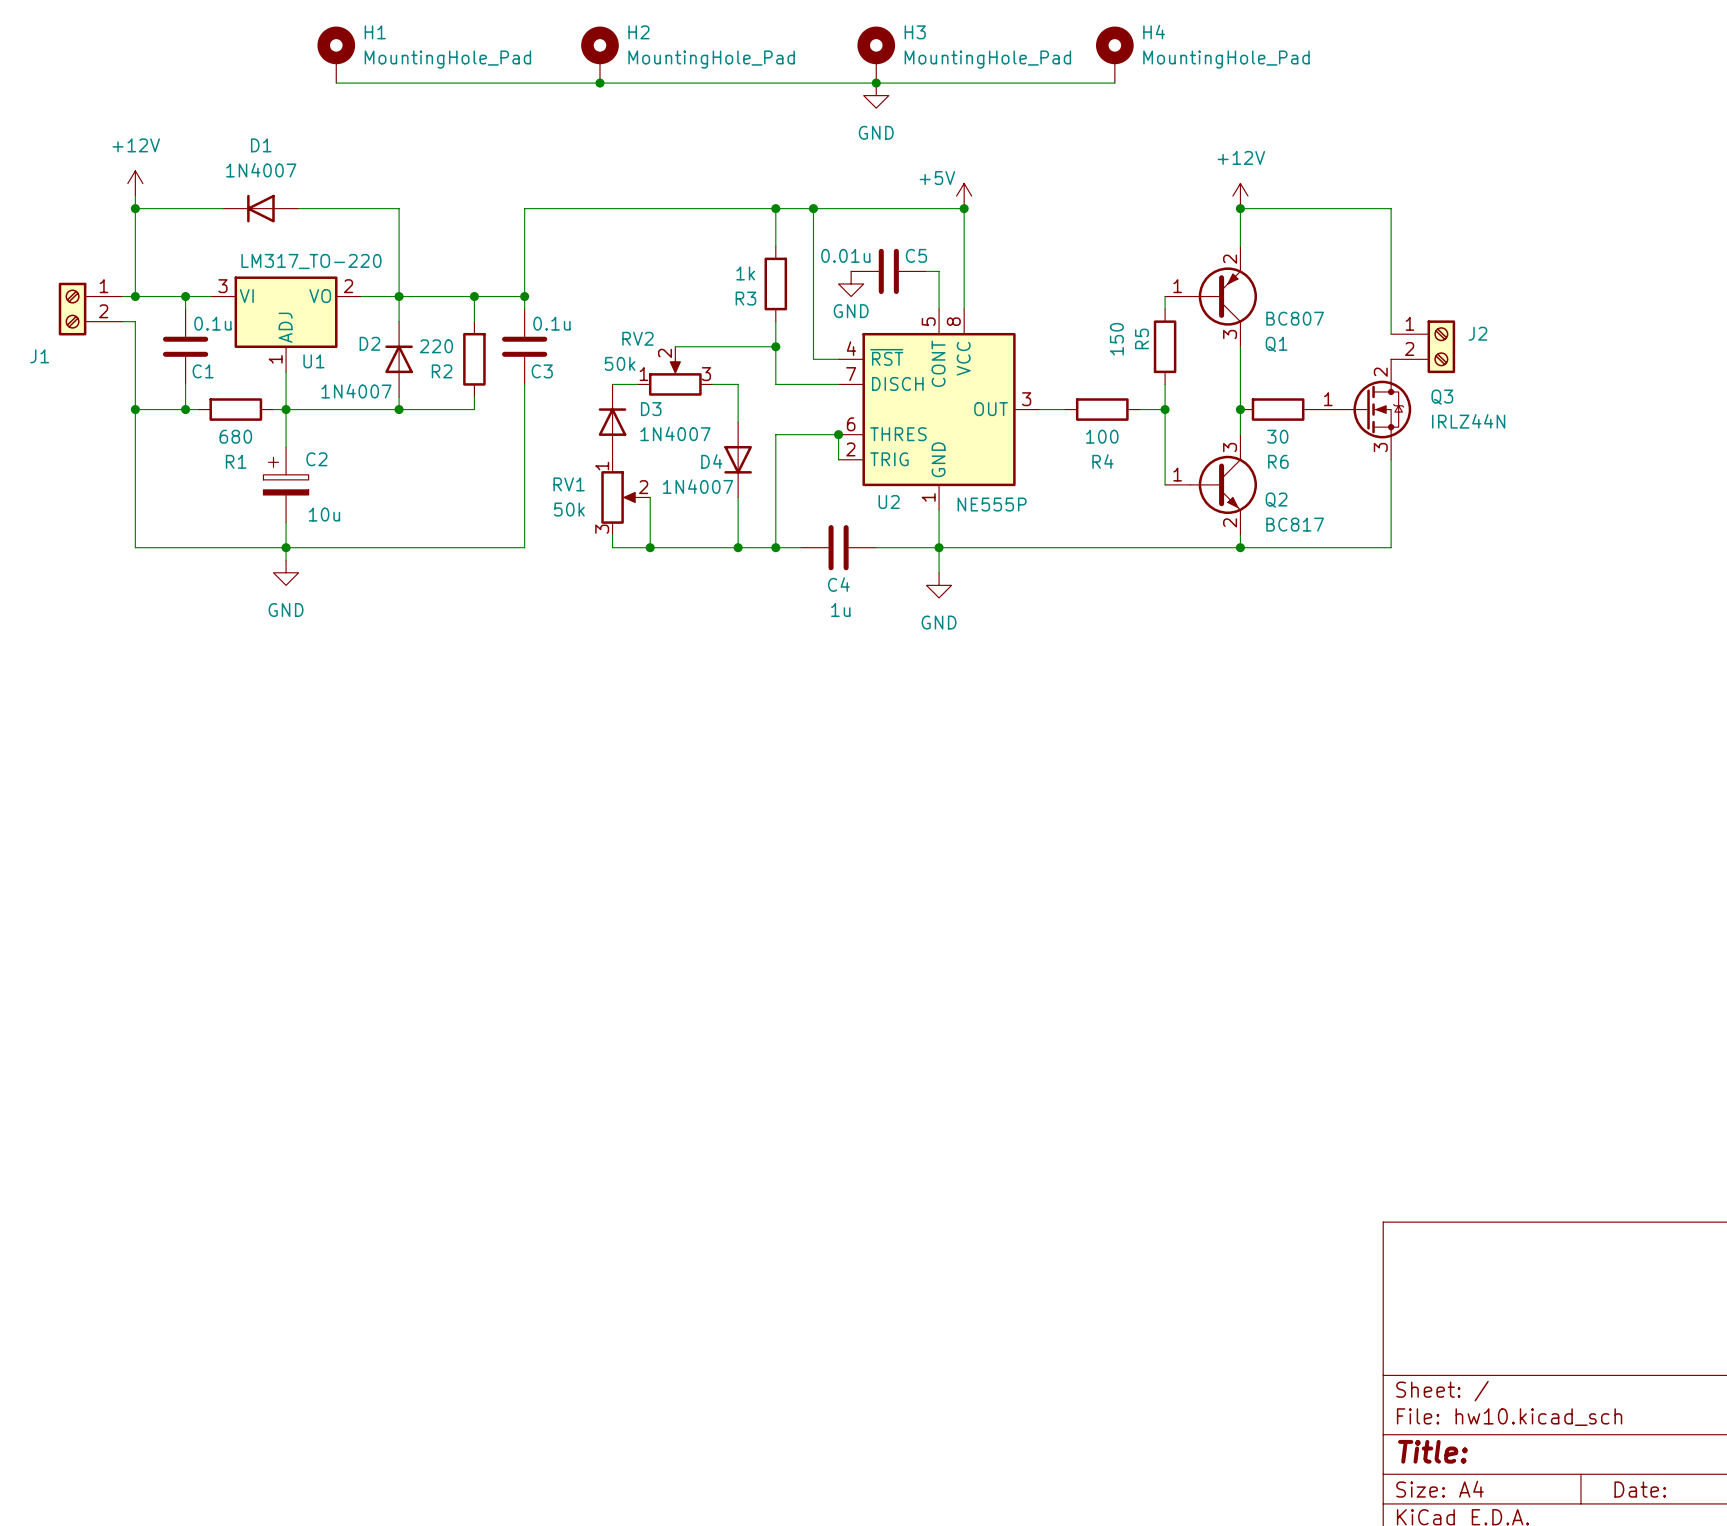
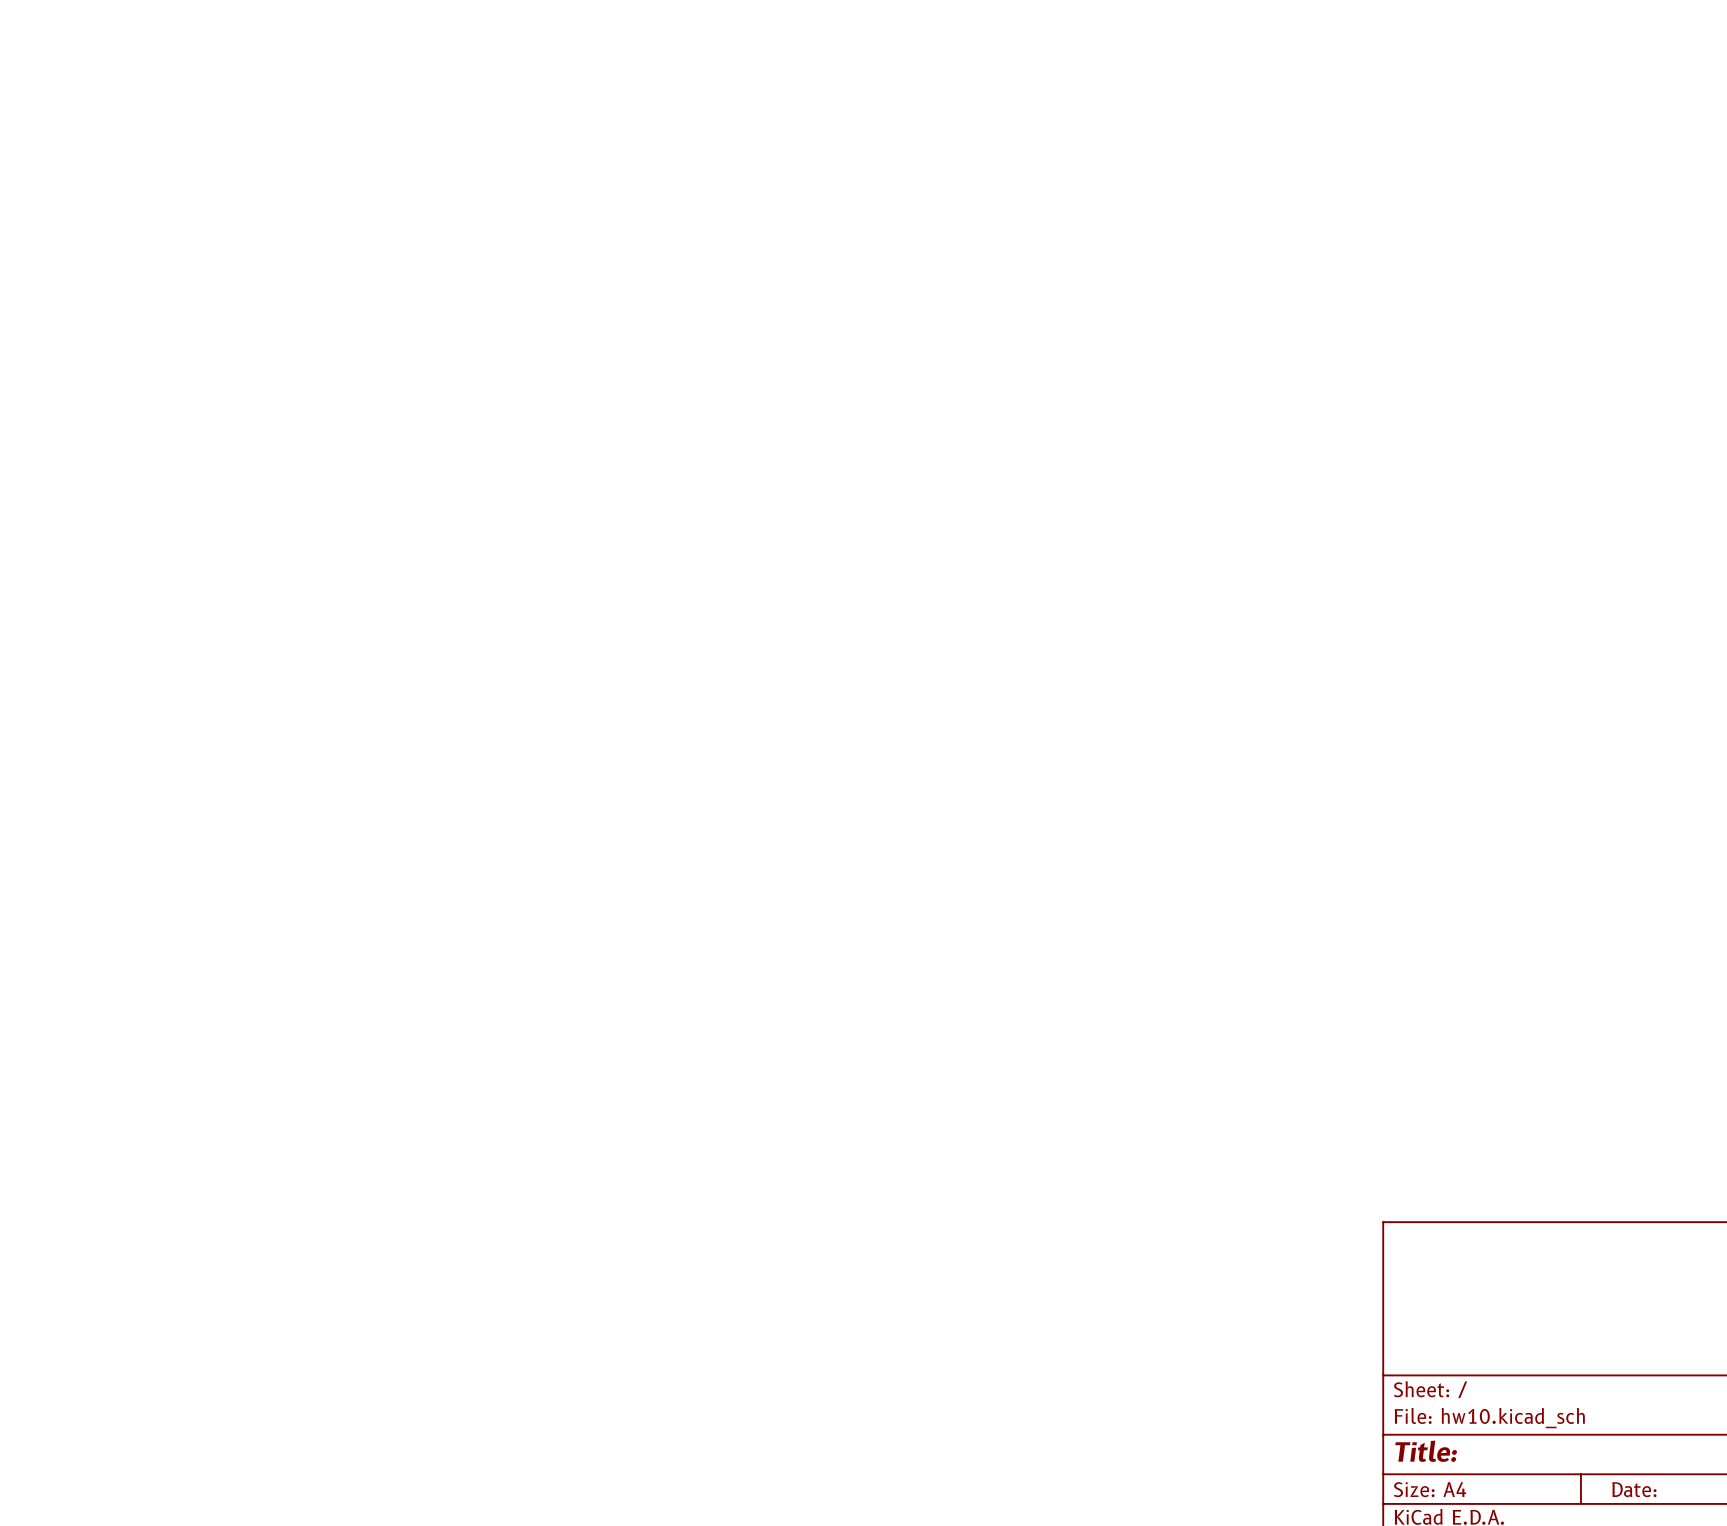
H1: MountingHole_Pad (336, 54) -> none
H2: MountingHole_Pad (599, 54) -> none
H3: MountingHole_Pad (876, 54) -> none
H4: MountingHole_Pad (1114, 54) -> none
wire: (336, 83) (1114, 83) -> none
junction: (599, 83) -> none
junction: (876, 83) -> none
power symbol: GND (876, 95) -> none
power symbol: +12V (135, 183) -> none
wire: (135, 196) (135, 296) -> none
power symbol: +5V (964, 196) -> none
power symbol: +12V (1240, 196) -> none
wire: (135, 208) (223, 208) -> none
junction: (135, 208) -> none
D1: 1N4007 (260, 208) -> none
wire: (298, 208) (399, 208) (399, 321) -> none
wire: (775, 208) (775, 246) -> none
junction: (775, 208) -> none
wire: (813, 208) (813, 359) (838, 359) -> none
junction: (813, 208) -> none
junction: (964, 208) -> none
junction: (1240, 208) -> none
wire: (1240, 246) (1240, 208) (1391, 208) (1391, 334) -> none
C5: 0.01u (888, 271) -> none
wire: (926, 271) (939, 271) (939, 309) -> none
R3: 1k (775, 283) -> none
power symbol: GND (851, 283) -> none
wire: (122, 296) (210, 296) -> none
junction: (135, 296) -> none
wire: (185, 296) (185, 309) -> none
junction: (185, 296) -> none
wire: (361, 296) (524, 296) -> none
junction: (399, 296) -> none
wire: (474, 296) (474, 321) -> none
junction: (474, 296) -> none
junction: (524, 296) -> none
wire: (1165, 296) (1165, 309) -> none
Q1: BC807 (1211, 296) -> none
J1: (90, 309) -> none
wire: (524, 309) (524, 208) (964, 208) (964, 309) -> none
wire: (122, 321) (135, 321) (135, 547) (524, 547) (524, 384) -> none
wire: (775, 321) (775, 384) (838, 384) -> none
U1: LM317_TO-220 (286, 324) -> none
C1: 0.1u (185, 346) -> none
C3: 0.1u (524, 346) -> none
wire: (675, 346) (775, 346) -> none
junction: (775, 346) -> none
R5: 150 (1165, 346) -> none
wire: (1240, 346) (1240, 434) -> none
J2: (1423, 346) -> none
D2: 1N4007 (399, 359) -> none
R2: 220 (474, 359) -> none
wire: (286, 371) (286, 447) -> none
RV2: 50k (675, 371) -> none
wire: (185, 384) (185, 409) -> none
wire: (612, 384) (637, 384) -> none
wire: (713, 384) (738, 384) (738, 422) -> none
wire: (1165, 384) (1165, 484) -> none
wire: (399, 397) (399, 409) -> none
wire: (474, 397) (474, 409) (273, 409) -> none
wire: (135, 409) (198, 409) -> none
junction: (135, 409) -> none
junction: (185, 409) -> none
R1: 680 (235, 409) -> none
junction: (286, 409) -> none
junction: (399, 409) -> none
U2: NE555P (939, 409) -> none
wire: (1039, 409) (1064, 409) -> none
R4: 100 (1102, 409) -> none
wire: (1139, 409) (1165, 409) -> none
junction: (1165, 409) -> none
junction: (1240, 409) -> none
R6: 30 (1278, 409) -> none
Q3: IRLZ44N (1363, 409) -> none
D3: 1N4007 (612, 422) -> none
junction: (838, 434) -> none
D4: 1N4007 (738, 459) -> none
wire: (838, 459) (838, 434) (775, 434) (775, 547) -> none
wire: (1391, 459) (1391, 547) (876, 547) -> none
C2: 10u (286, 484) -> none
Q2: BC817 (1211, 484) -> none
RV1: 50k (625, 497) -> none
wire: (650, 497) (650, 547) -> none
wire: (738, 497) (738, 547) -> none
wire: (939, 510) (939, 572) -> none
wire: (286, 522) (286, 560) -> none
wire: (612, 535) (612, 547) (800, 547) -> none
wire: (1240, 535) (1240, 547) -> none
junction: (286, 547) -> none
junction: (650, 547) -> none
junction: (738, 547) -> none
junction: (775, 547) -> none
C4: 1u (838, 547) -> none
junction: (939, 547) -> none
junction: (1240, 547) -> none
power symbol: GND (286, 572) -> none
power symbol: GND (939, 585) -> none

